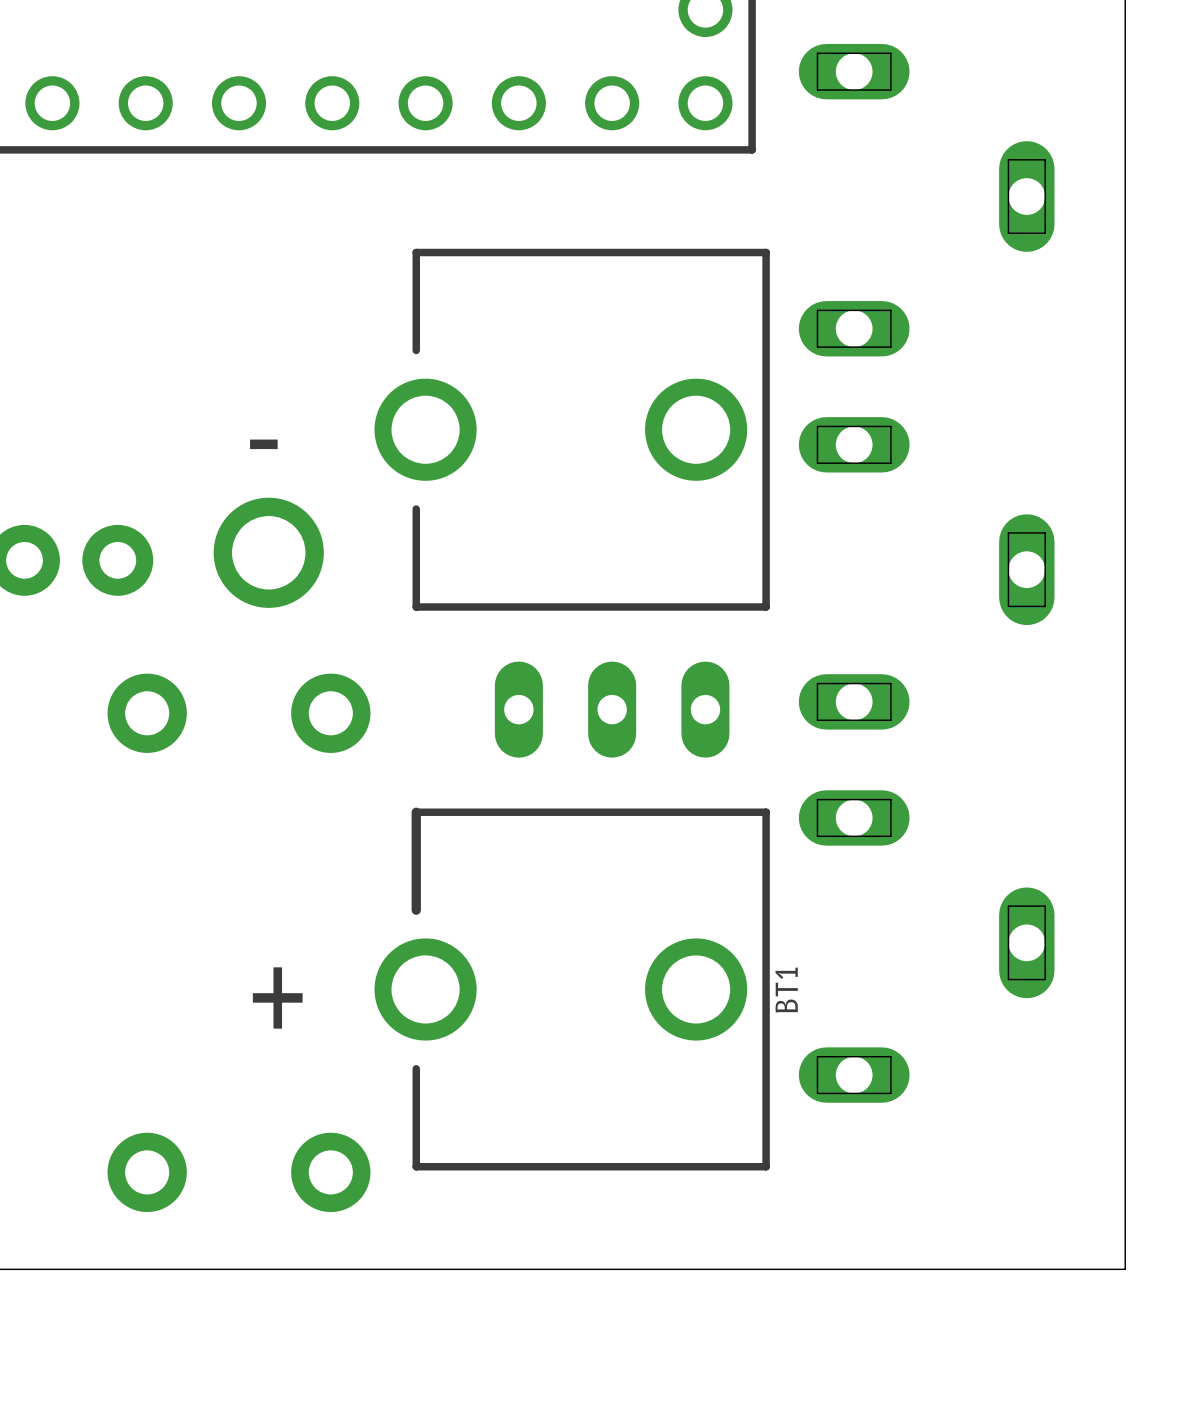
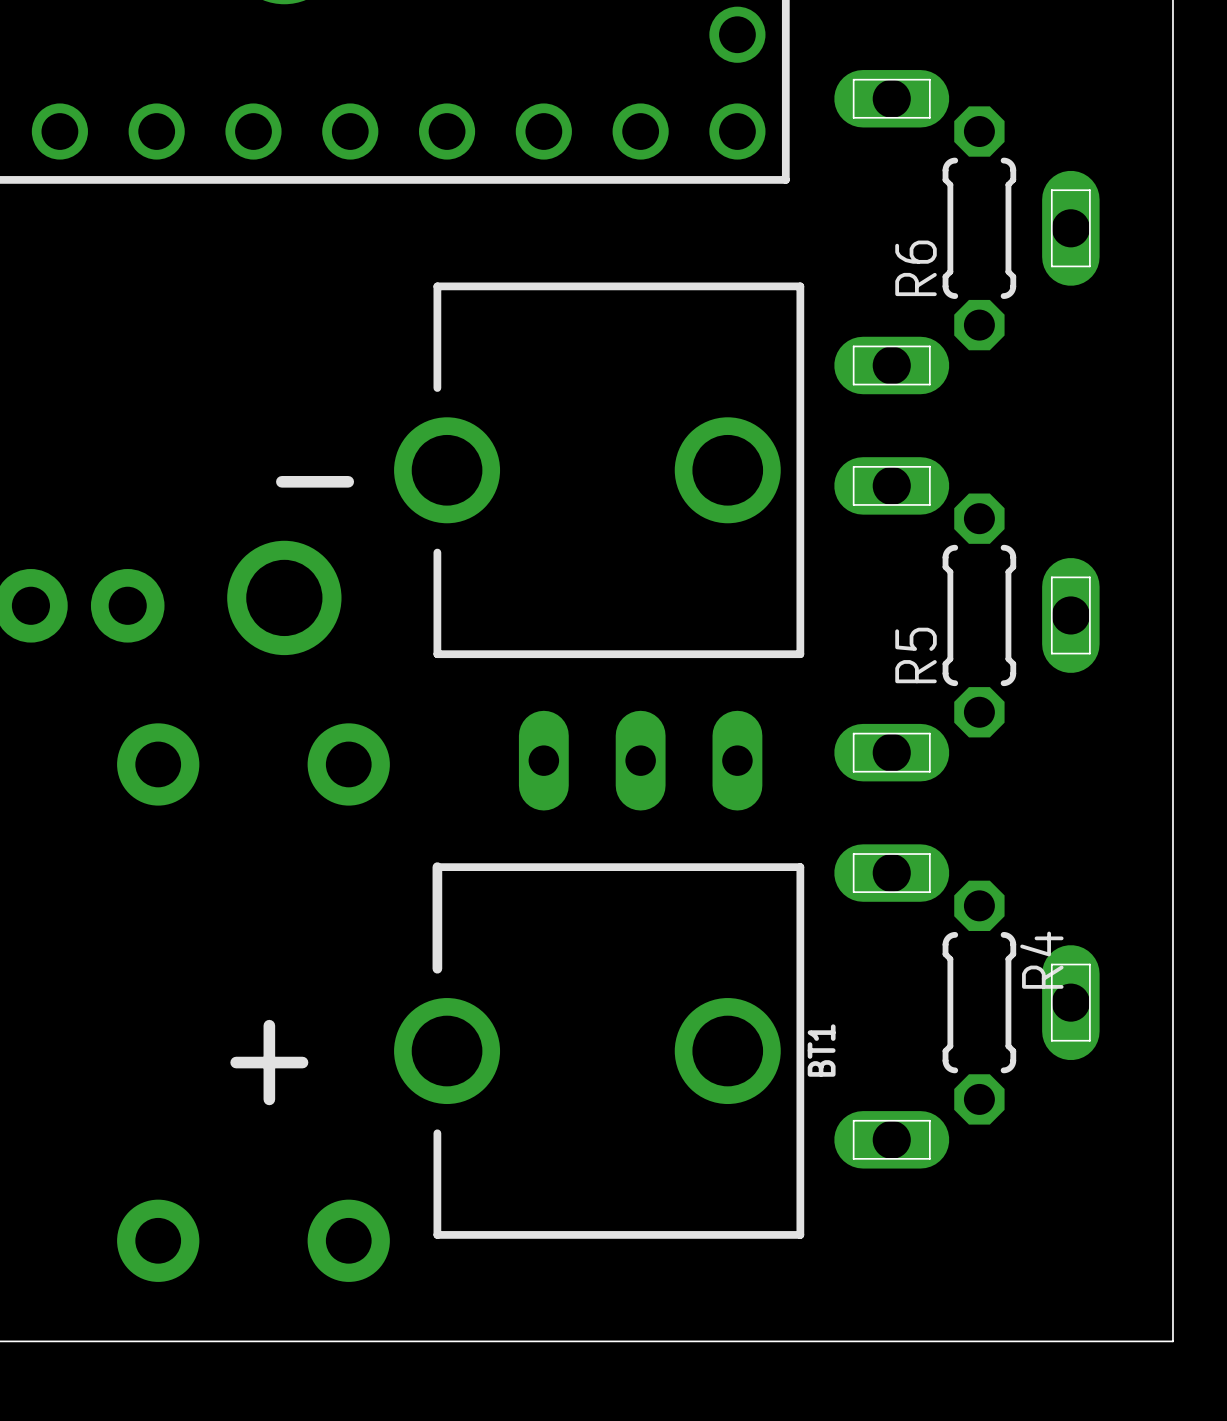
R6: none -> (979, 228)
R5: none -> (979, 615)
R4: none -> (979, 1002)

